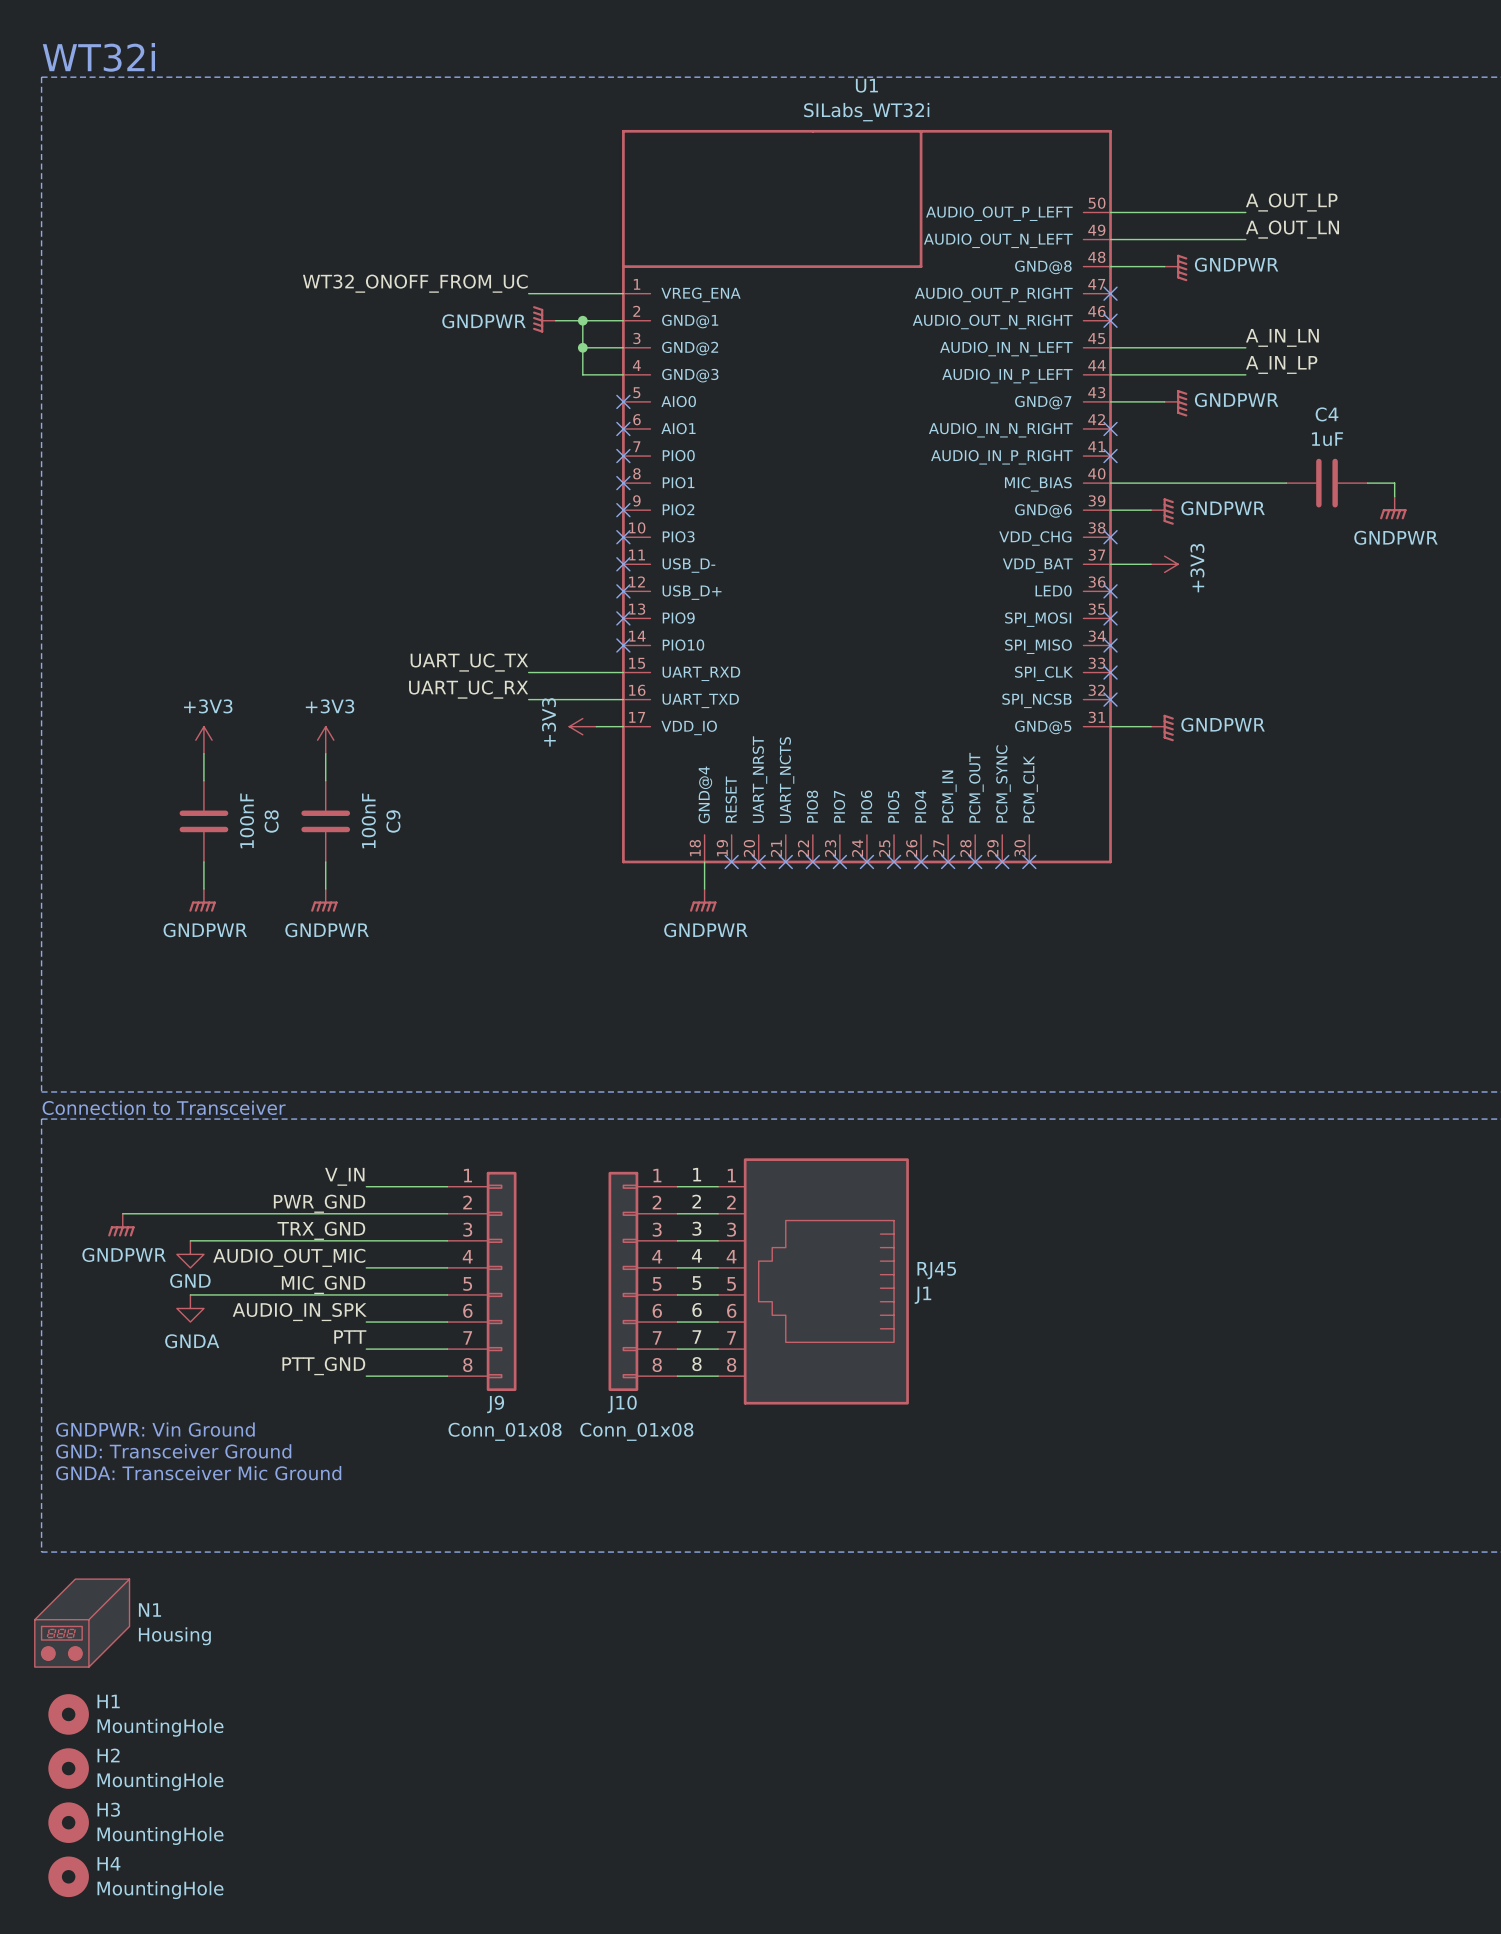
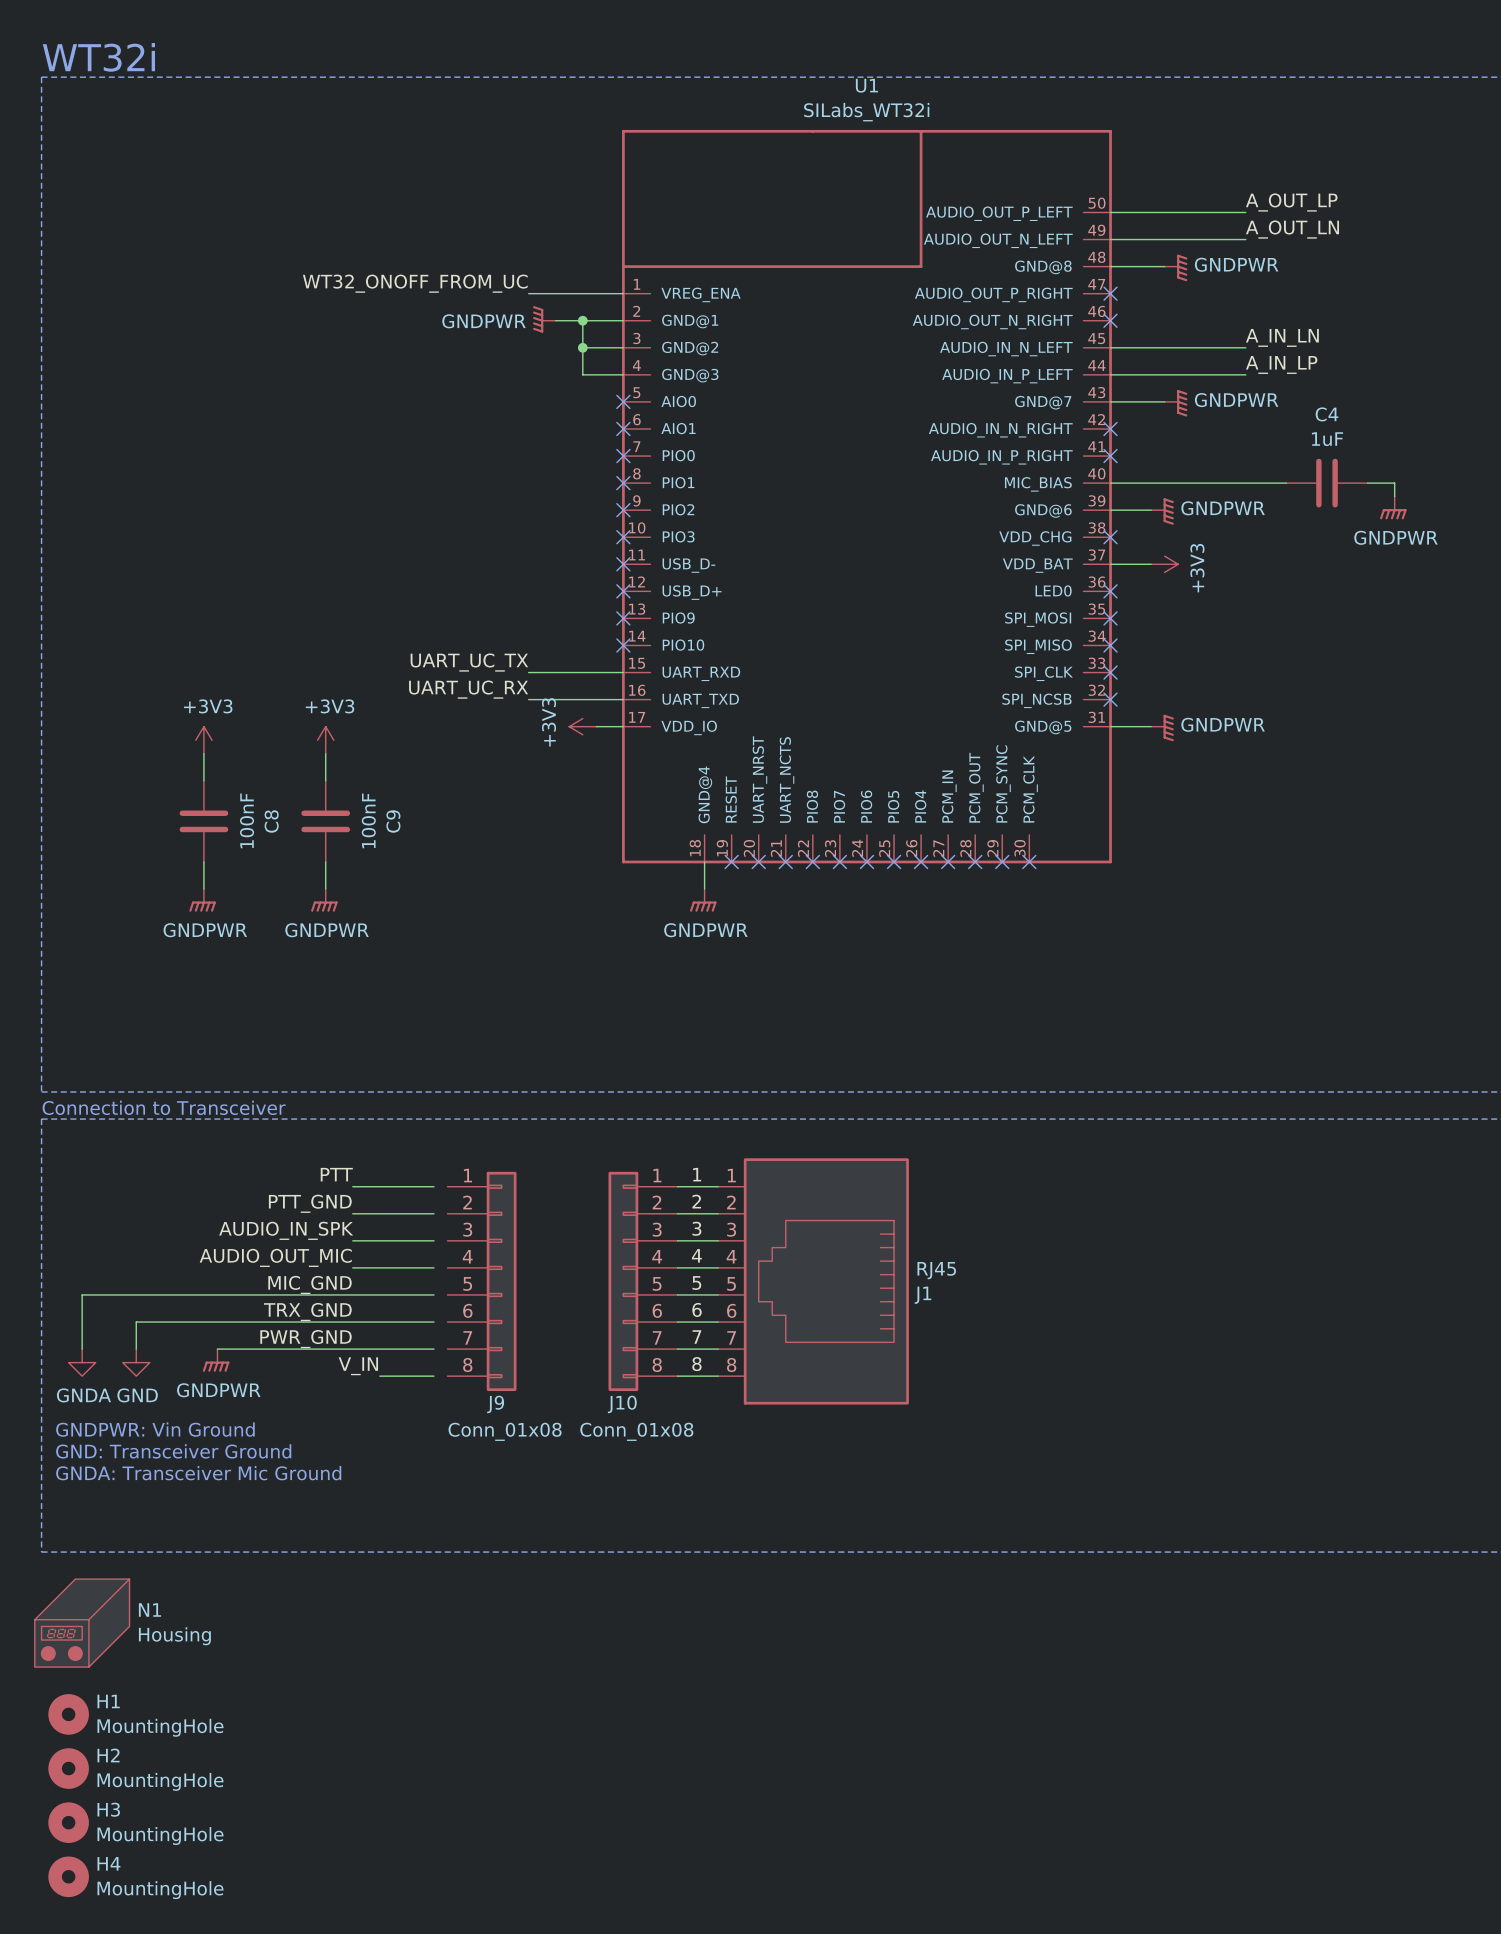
label position: V_IN (344, 1176) -> V_IN (358, 1366)
wire: (433, 1186) (447, 1186) -> (352, 1186) (366, 1186)
label position: PWR_GND (319, 1203) -> PWR_GND (306, 1339)
wire: (122, 1213) (352, 1213) -> none
wire: (433, 1213) (447, 1213) -> none
power symbol position: GNDPWR (121, 1225) -> GNDPWR (216, 1360)
label position: TRX_GND (321, 1230) -> TRX_GND (307, 1312)
wire: (190, 1240) (352, 1240) -> none
wire: (433, 1240) (447, 1240) -> none
power symbol position: GND (190, 1254) -> GND (136, 1362)
label position: AUDIO_OUT_MIC (289, 1257) -> AUDIO_OUT_MIC (275, 1257)
wire: (433, 1267) (447, 1267) -> (352, 1267) (366, 1267)
power symbol text position: GND (190, 1280) -> GND (137, 1395)
label position: MIC_GND (323, 1284) -> MIC_GND (310, 1284)
wire: none -> (190, 1294) (82, 1294) (82, 1349)
wire: (433, 1294) (447, 1294) -> none
power symbol position: GNDA (190, 1308) -> GNDA (82, 1362)
label position: AUDIO_IN_SPK (299, 1312) -> AUDIO_IN_SPK (286, 1230)
wire: none -> (366, 1322) (136, 1322) (136, 1349)
wire: (433, 1322) (447, 1322) -> none
label position: PTT (350, 1337) -> PTT (336, 1174)
wire: none -> (217, 1349) (366, 1349)
wire: (433, 1349) (447, 1349) -> none
label position: PTT_GND (323, 1366) -> PTT_GND (310, 1203)
wire: (366, 1376) (379, 1376) -> none
wire: (433, 1376) (447, 1376) -> none

